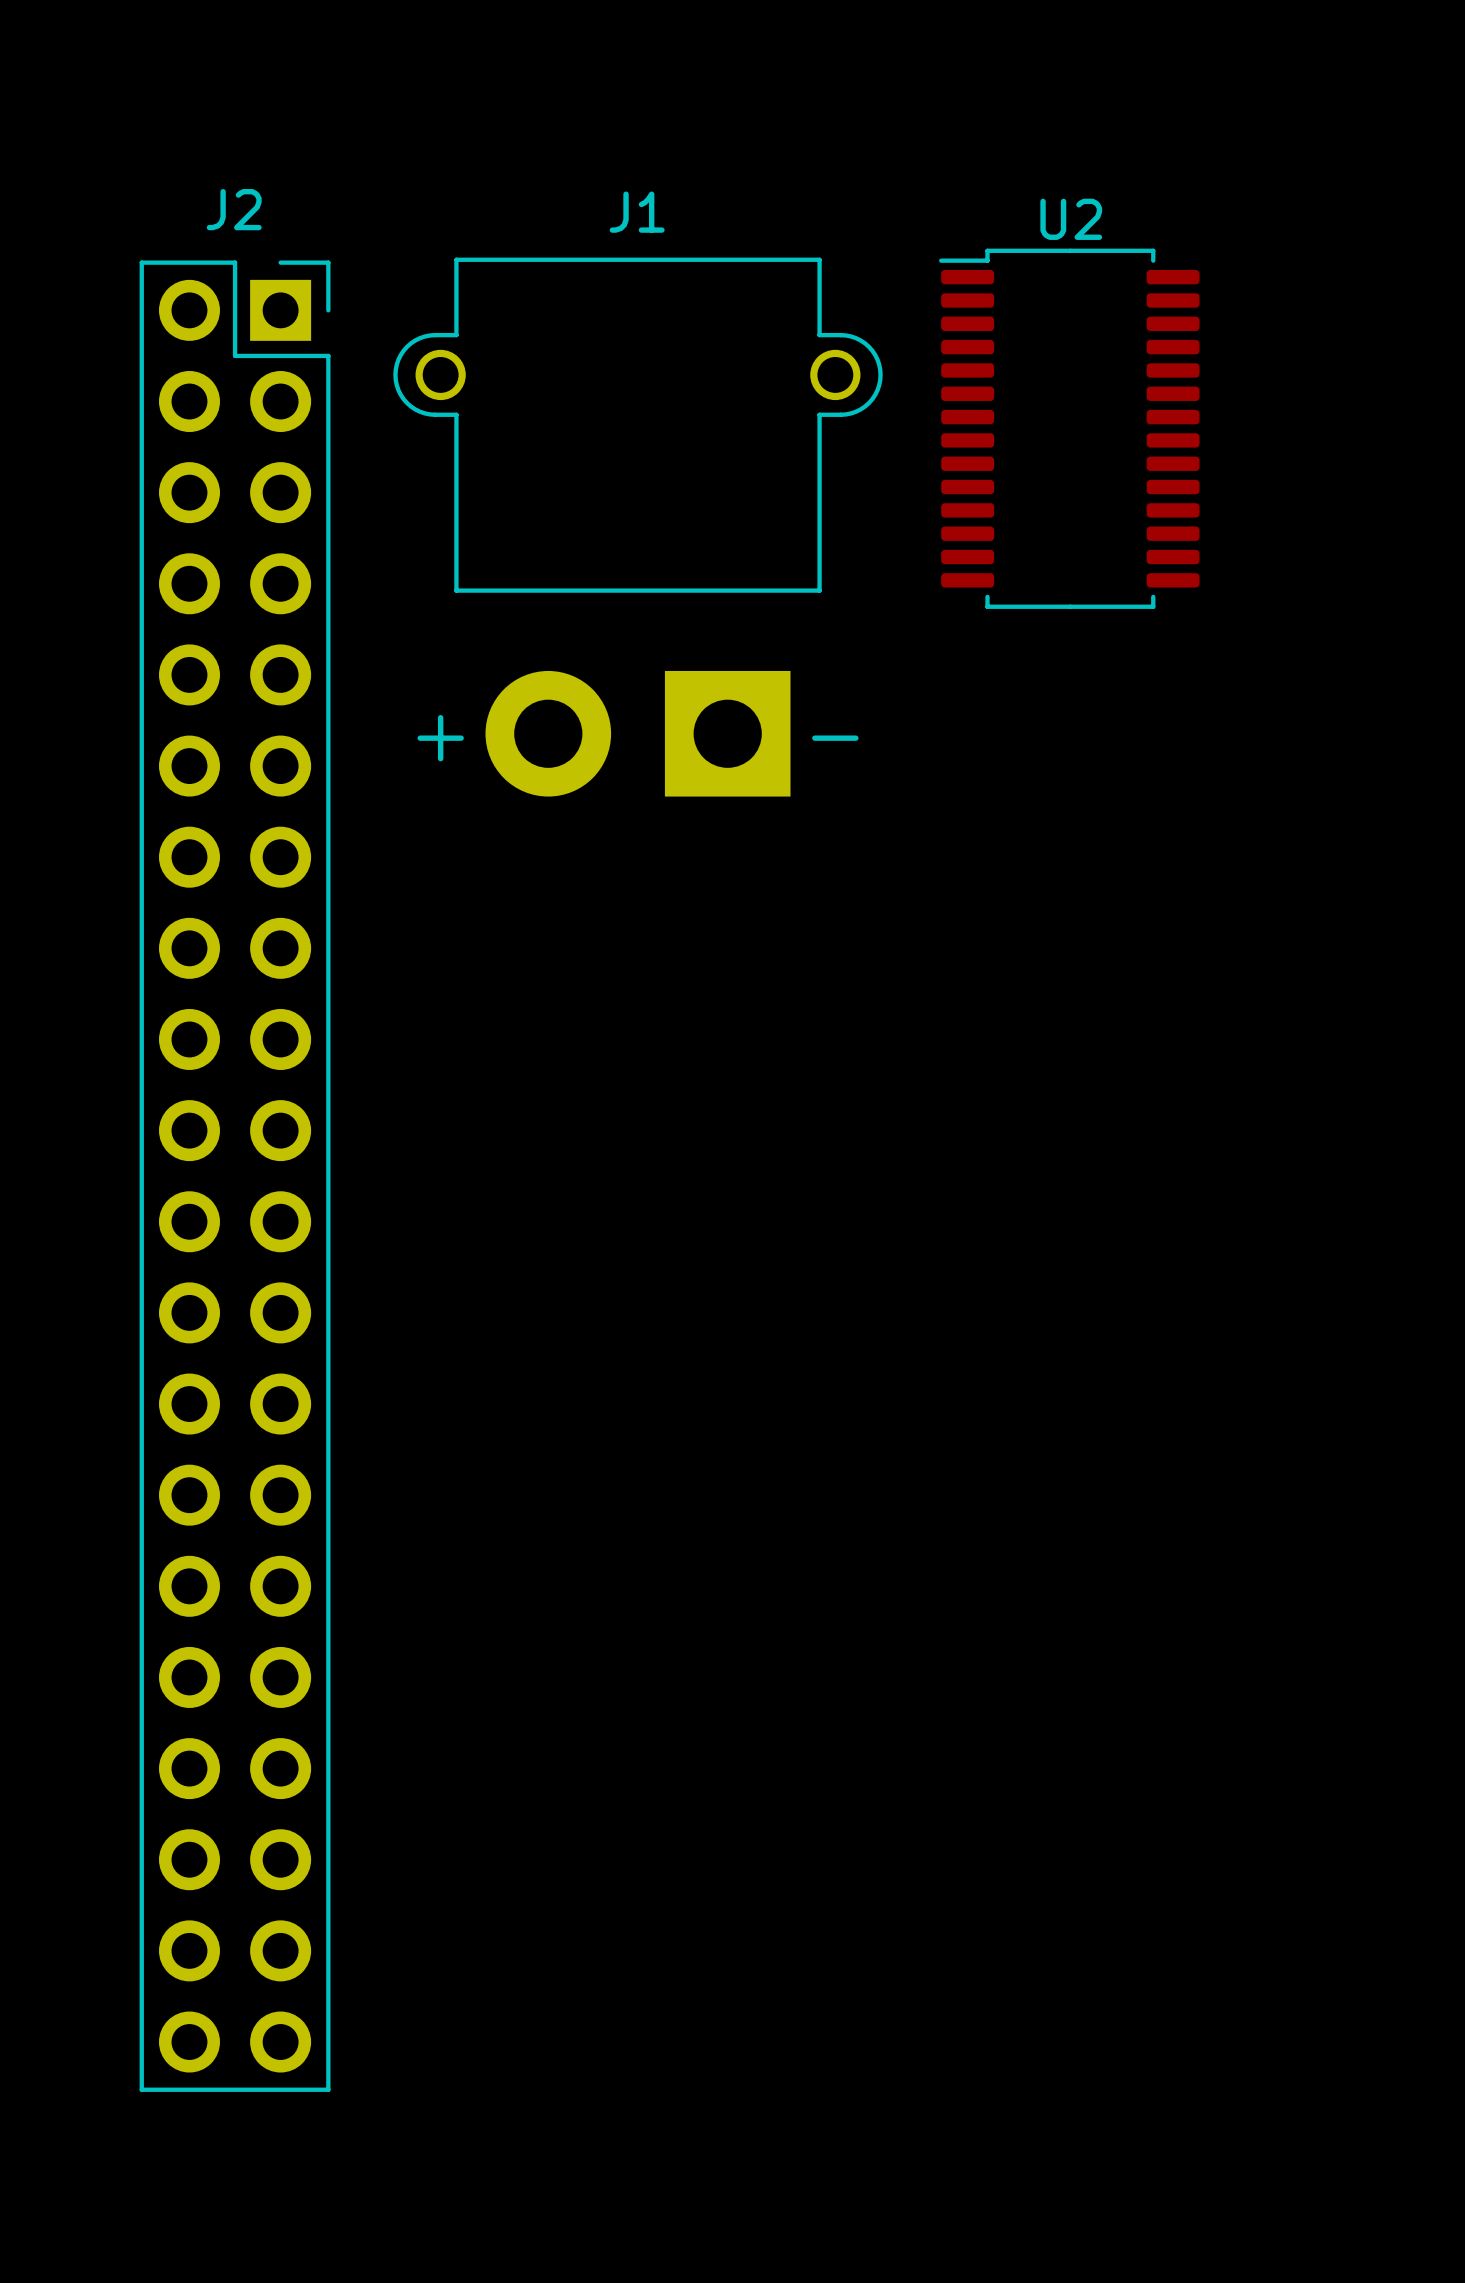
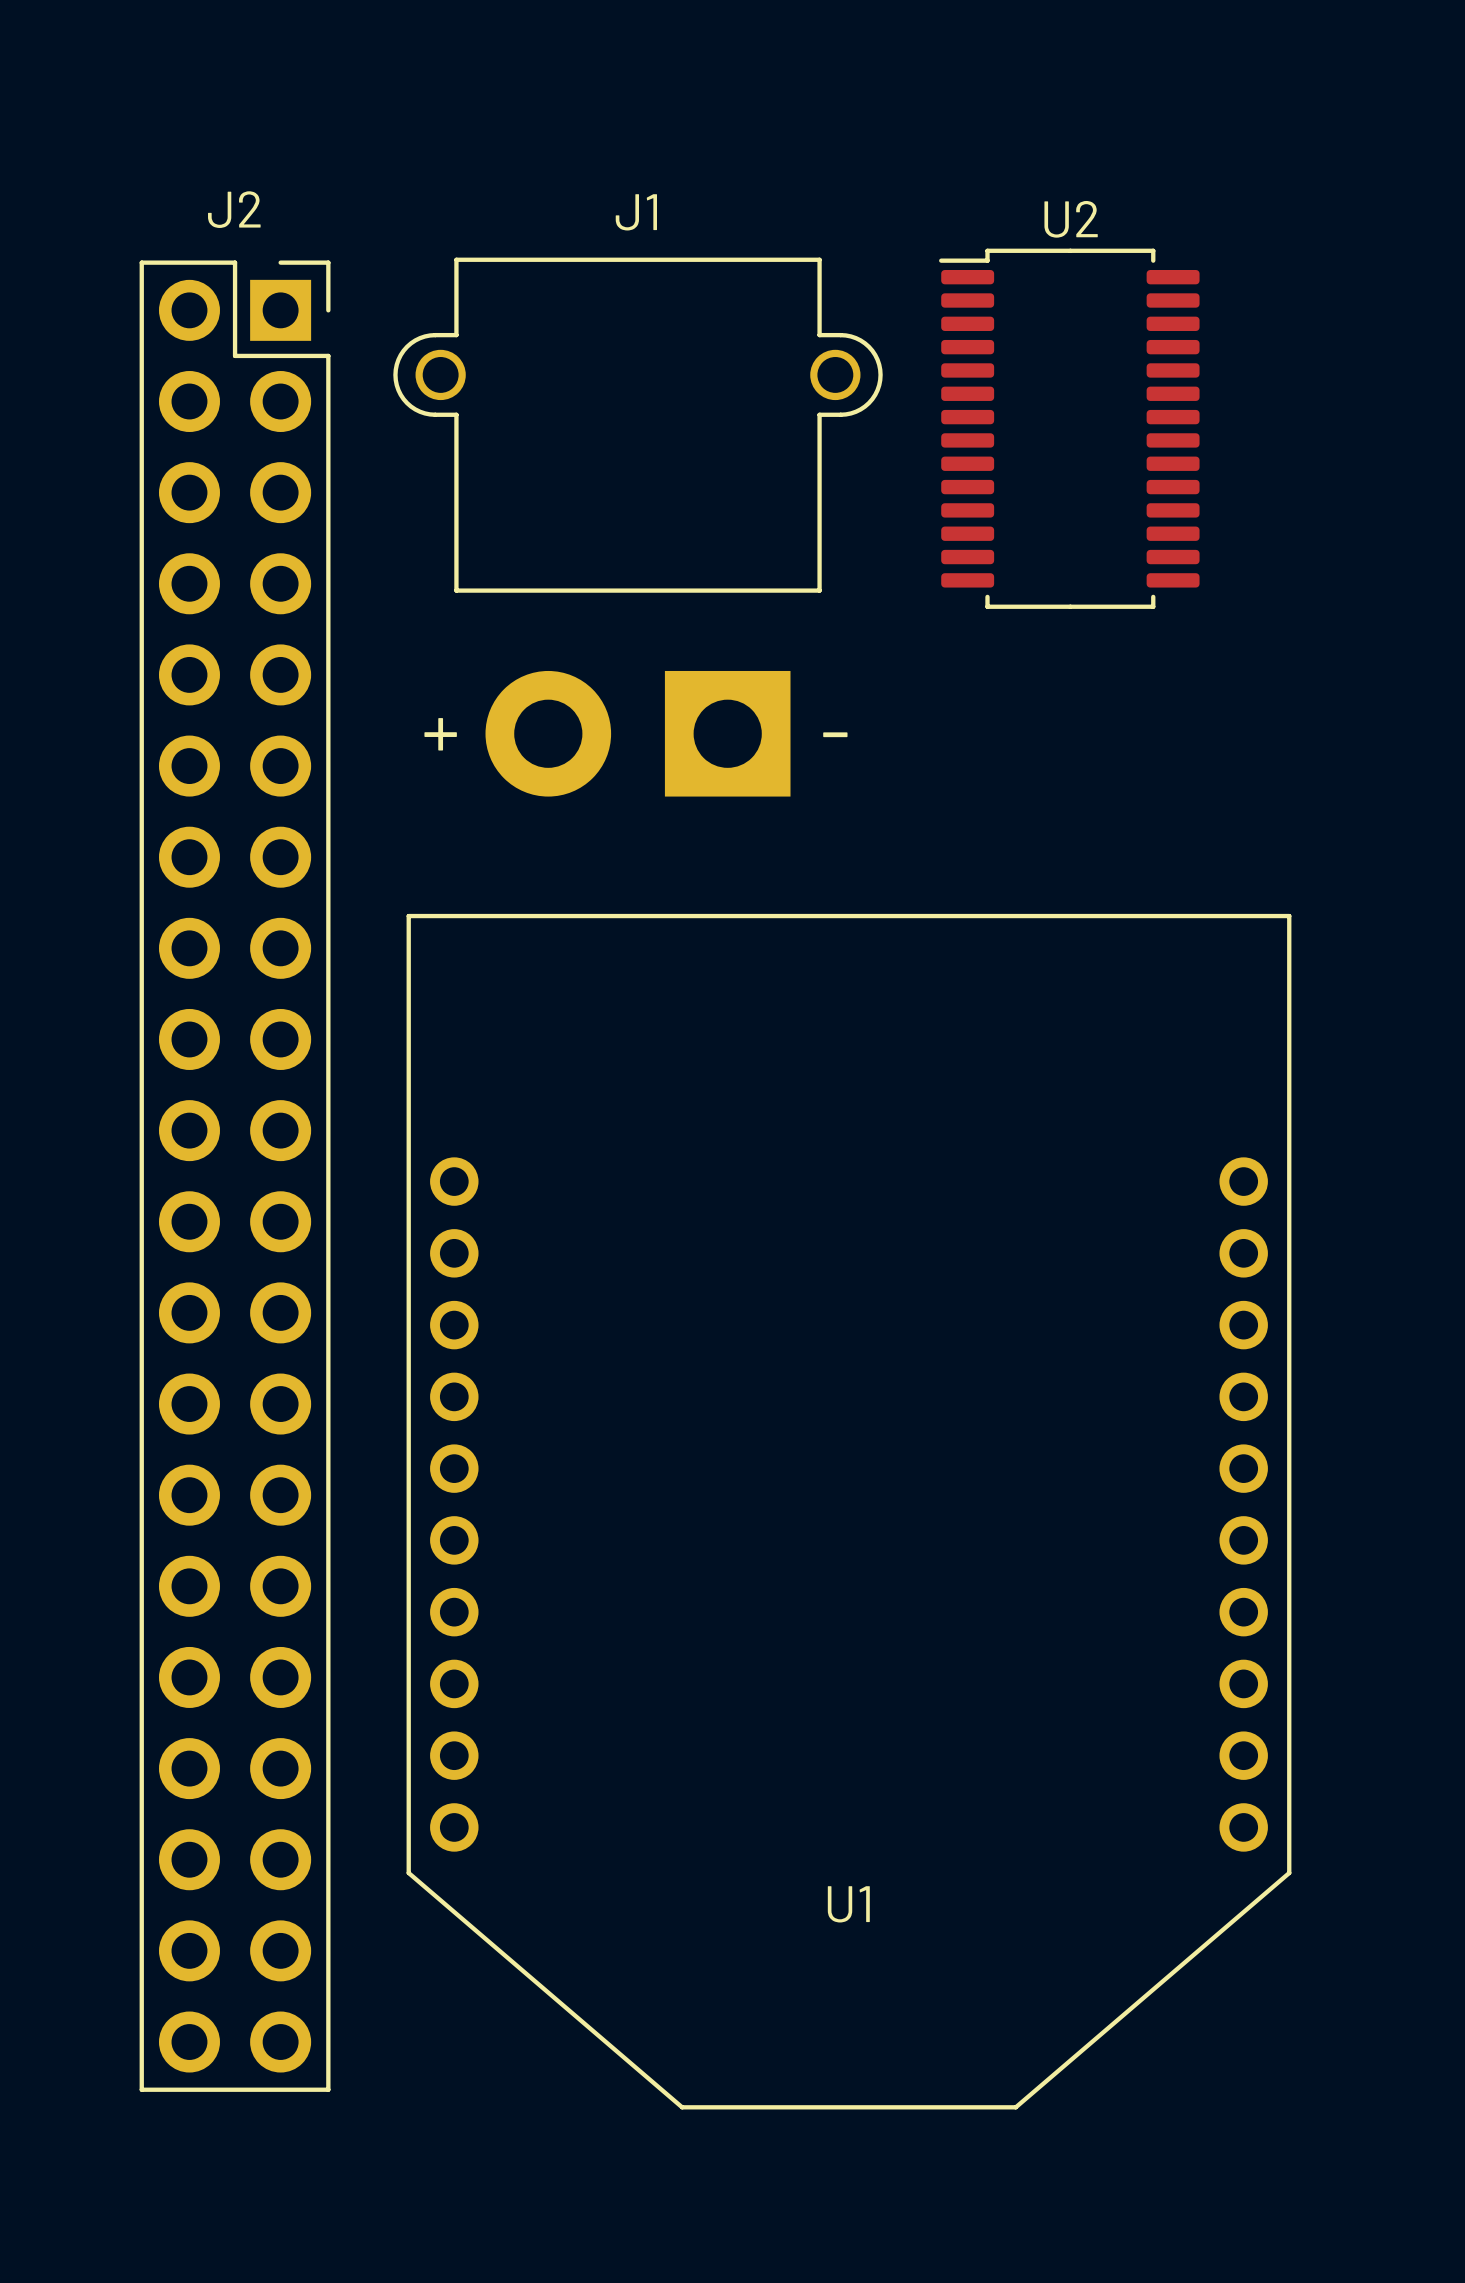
U1: none -> (848, 1511)

